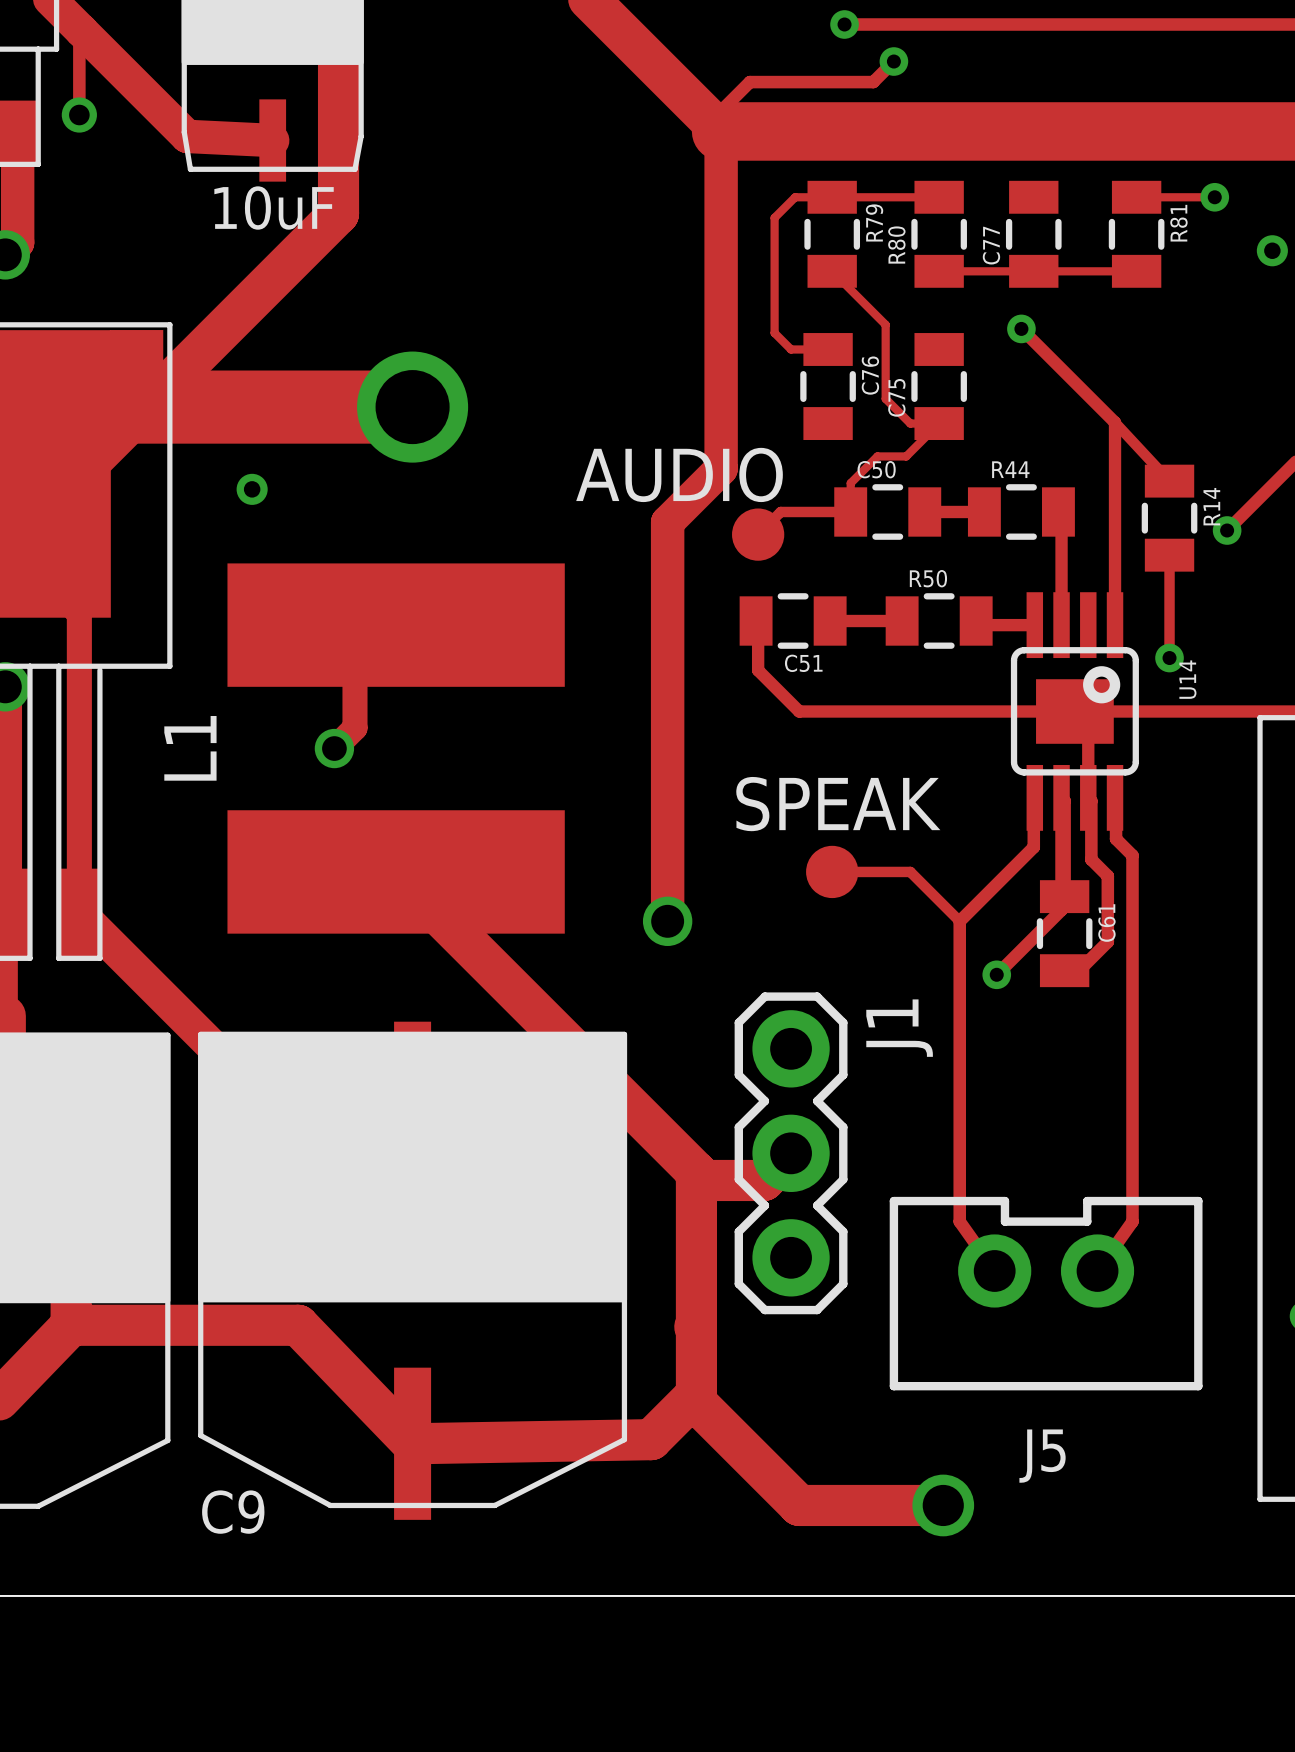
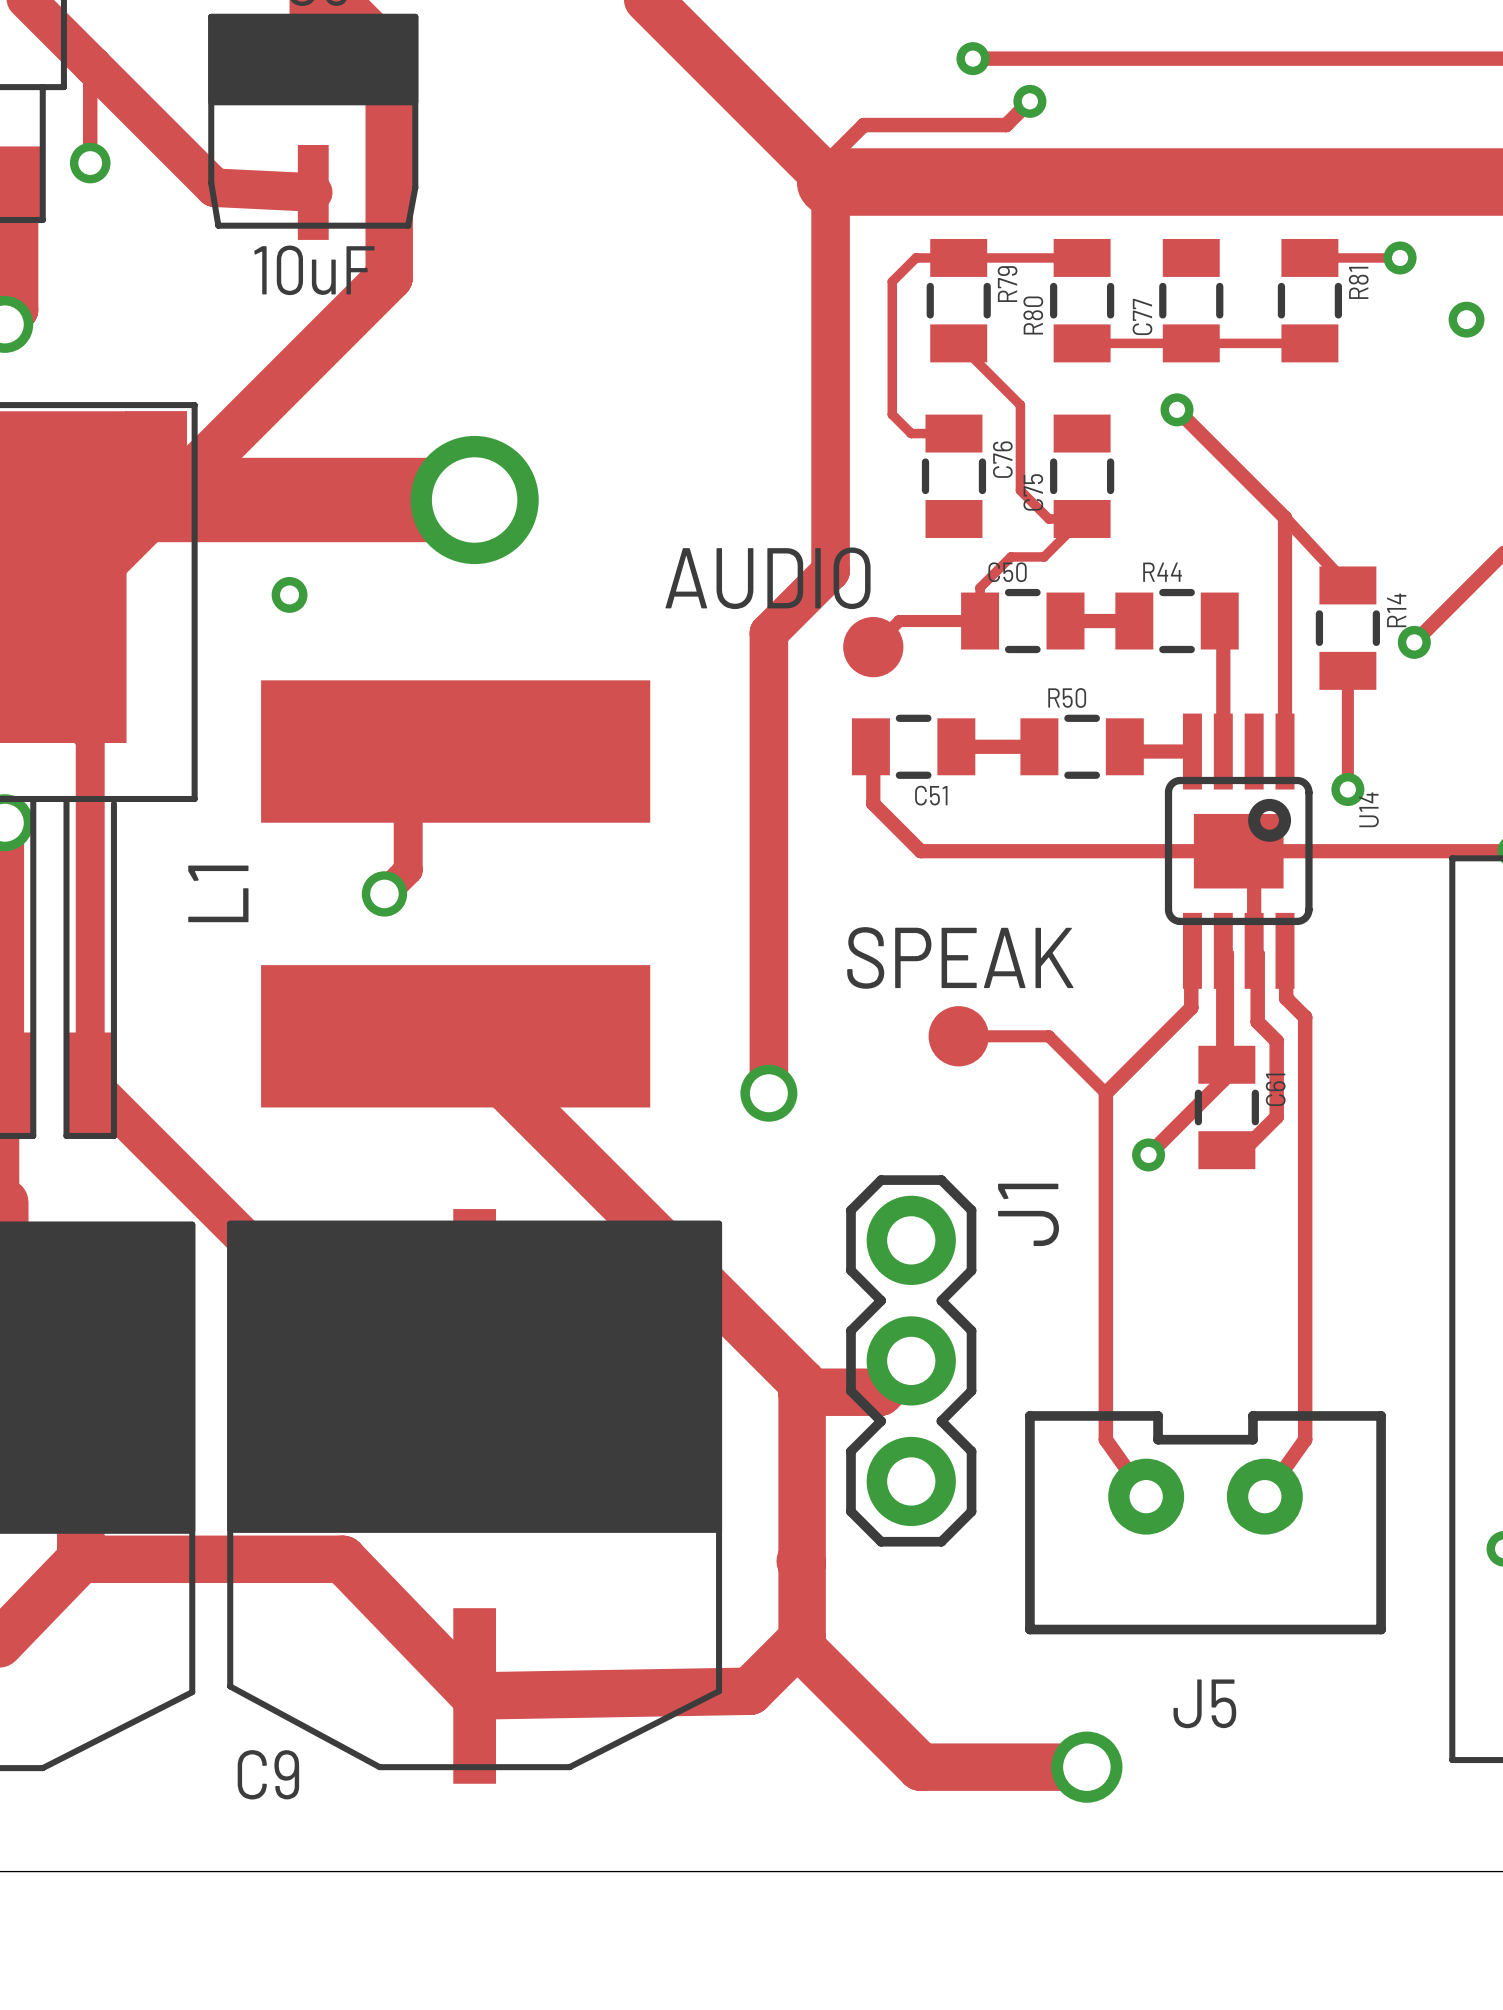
J5 footprint: [889, 1196, 1203, 1391] -> [1025, 1411, 1386, 1635]

